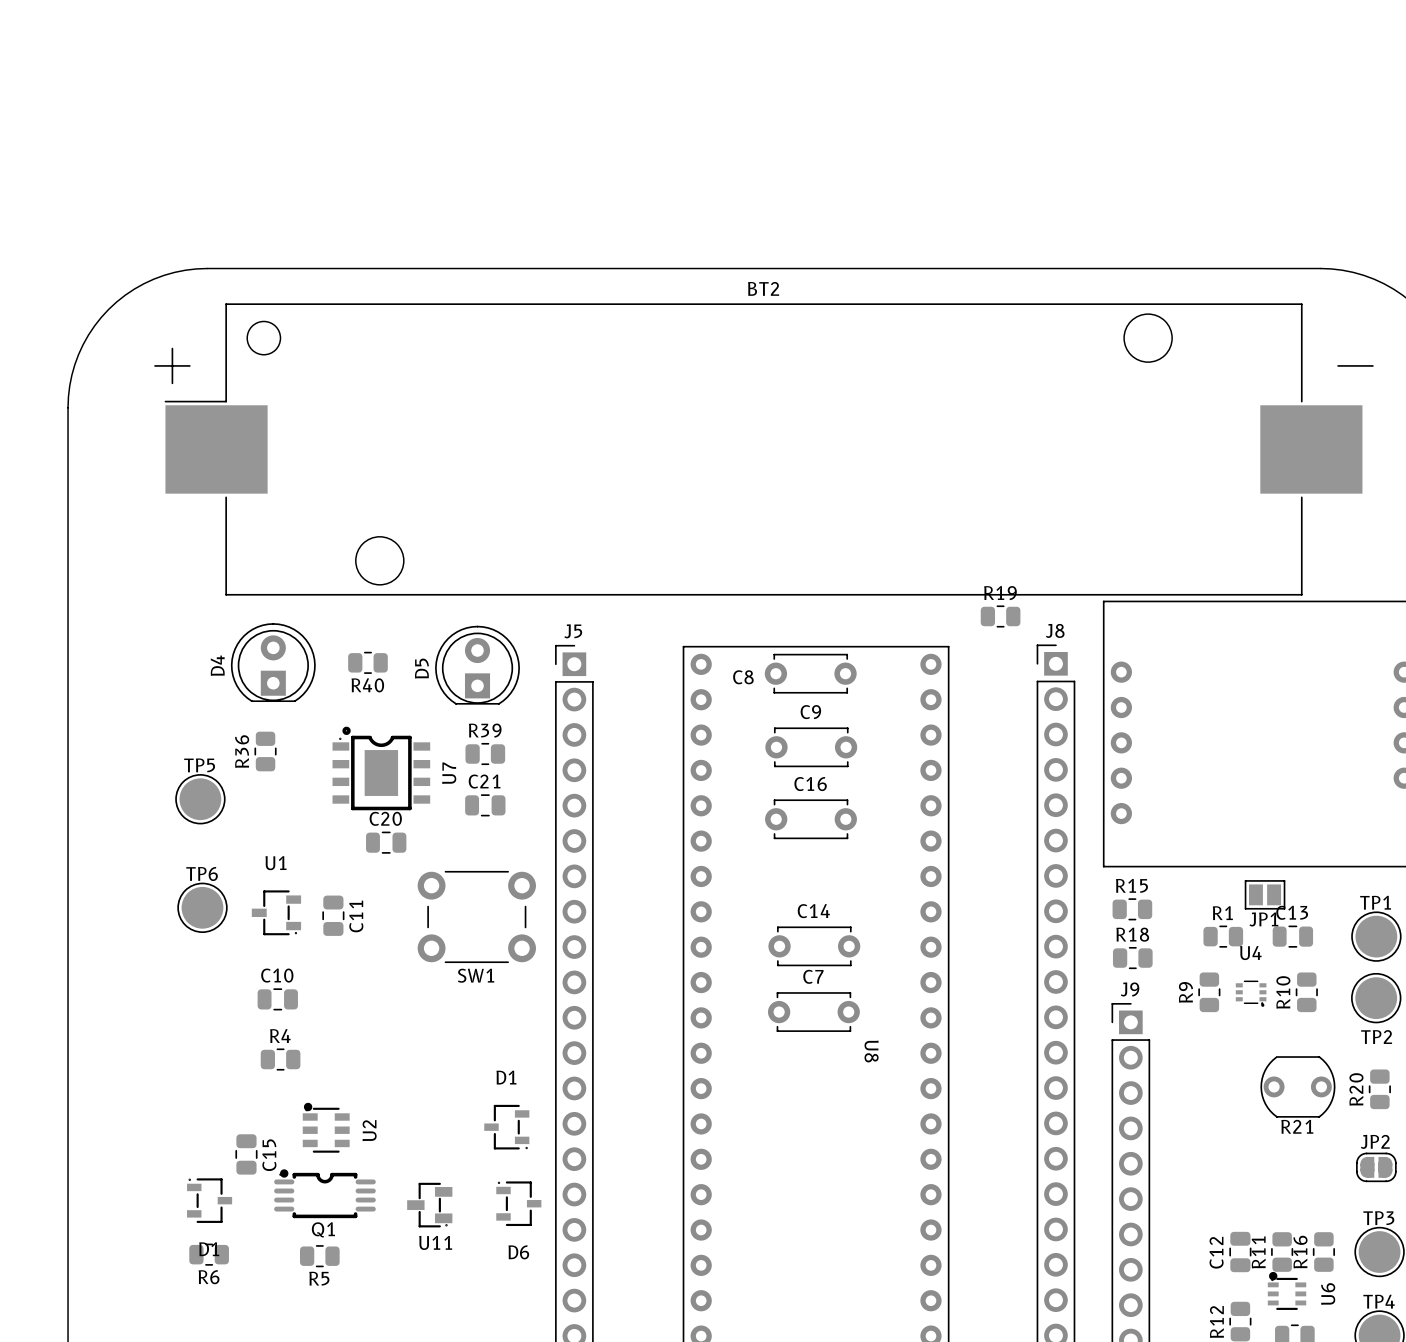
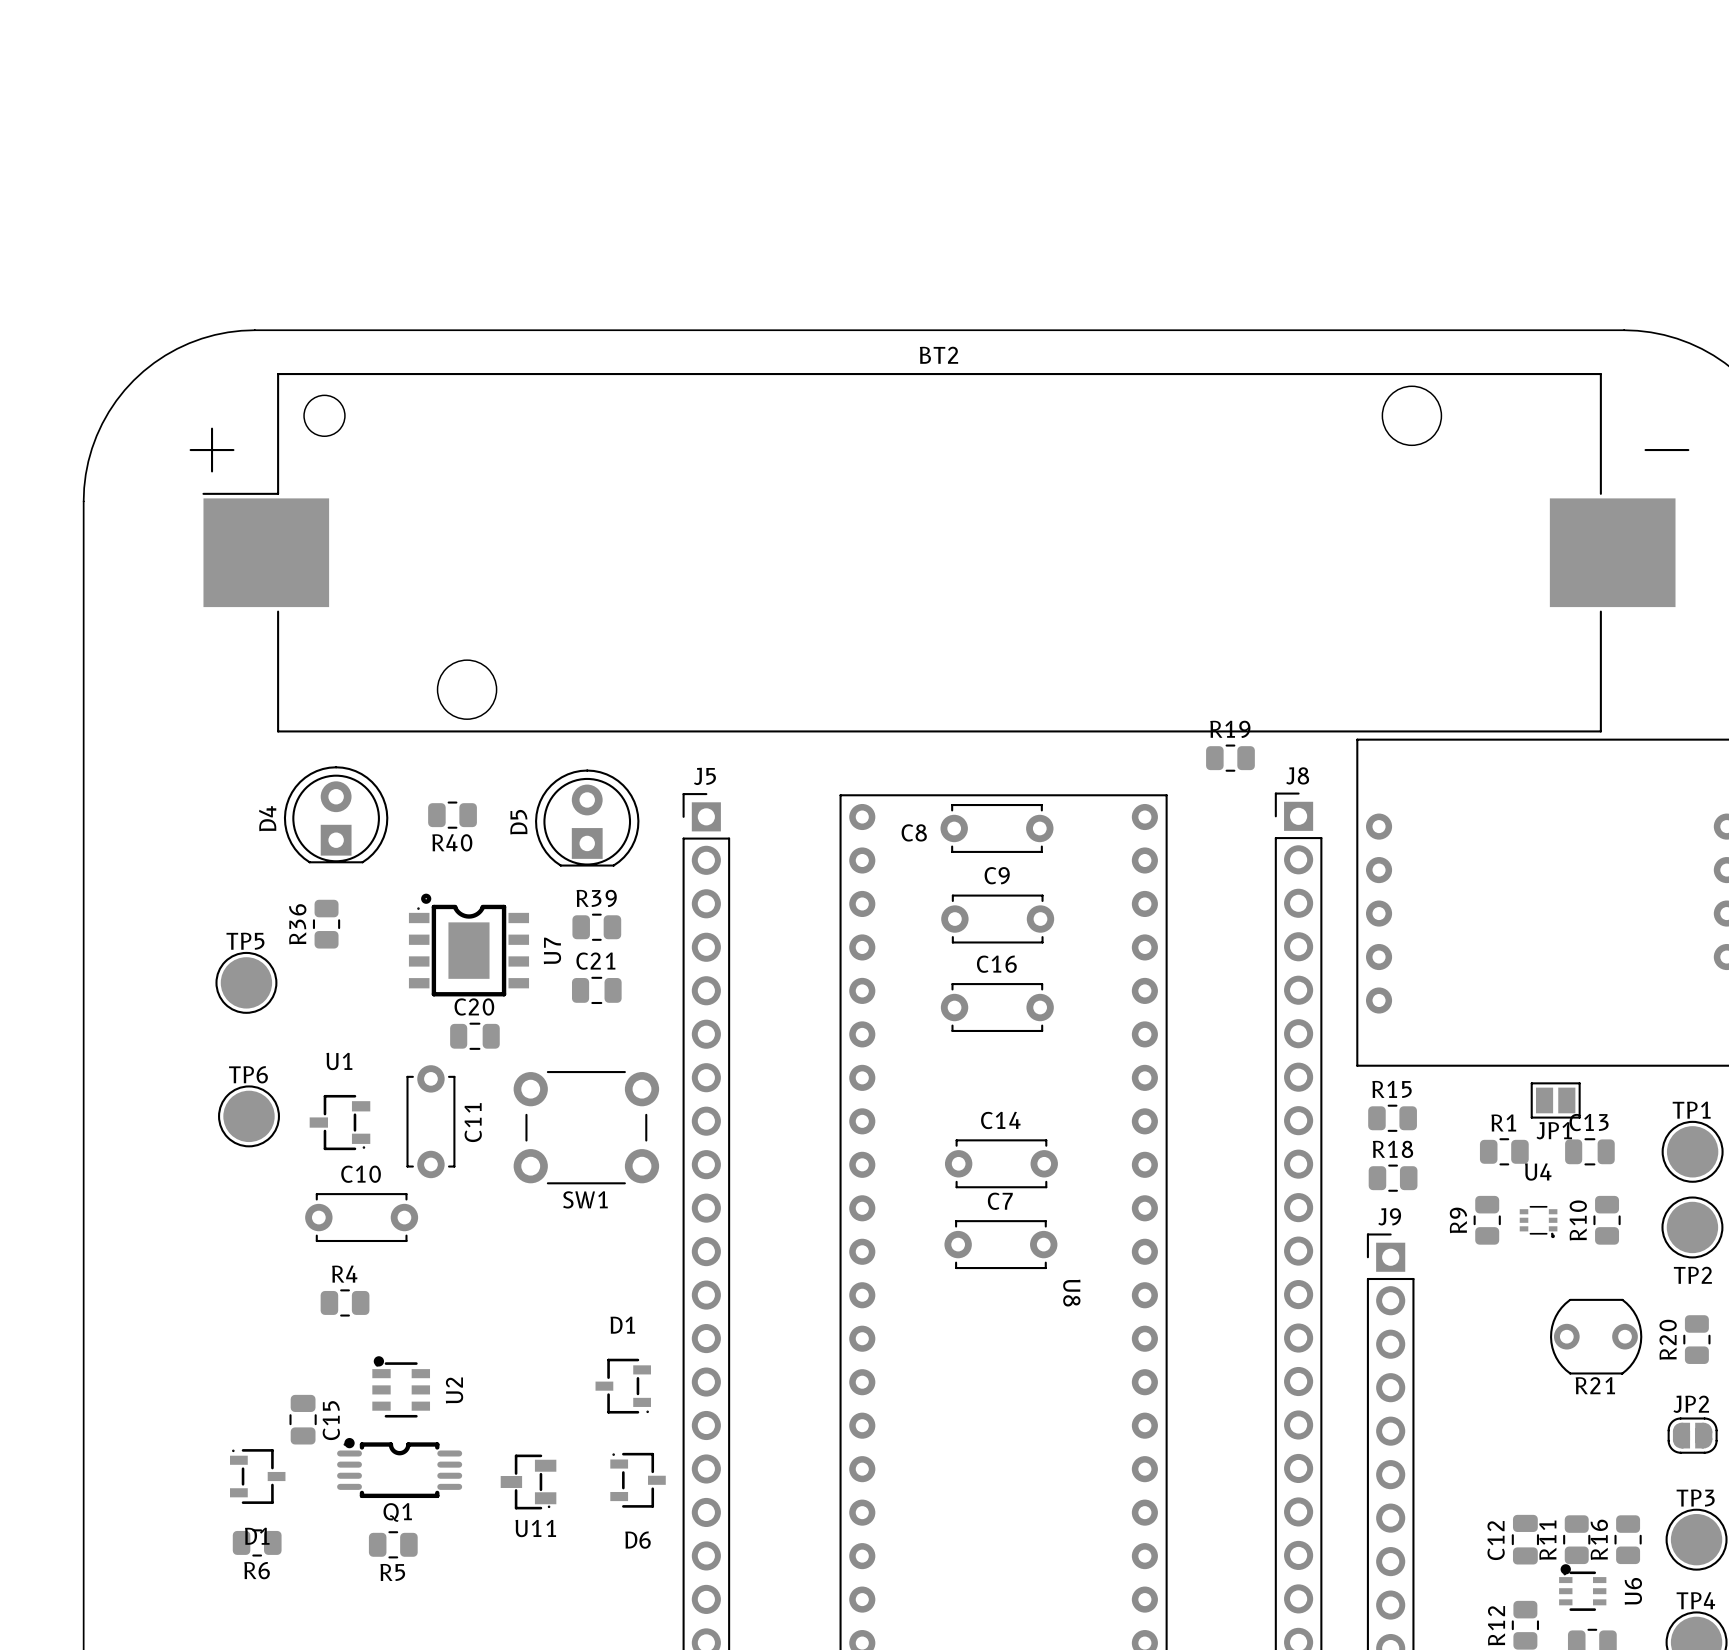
C11 footprint: [322, 895, 345, 936] -> [406, 1065, 456, 1179]
C10 footprint: [257, 988, 298, 1011] -> [305, 1193, 419, 1243]

